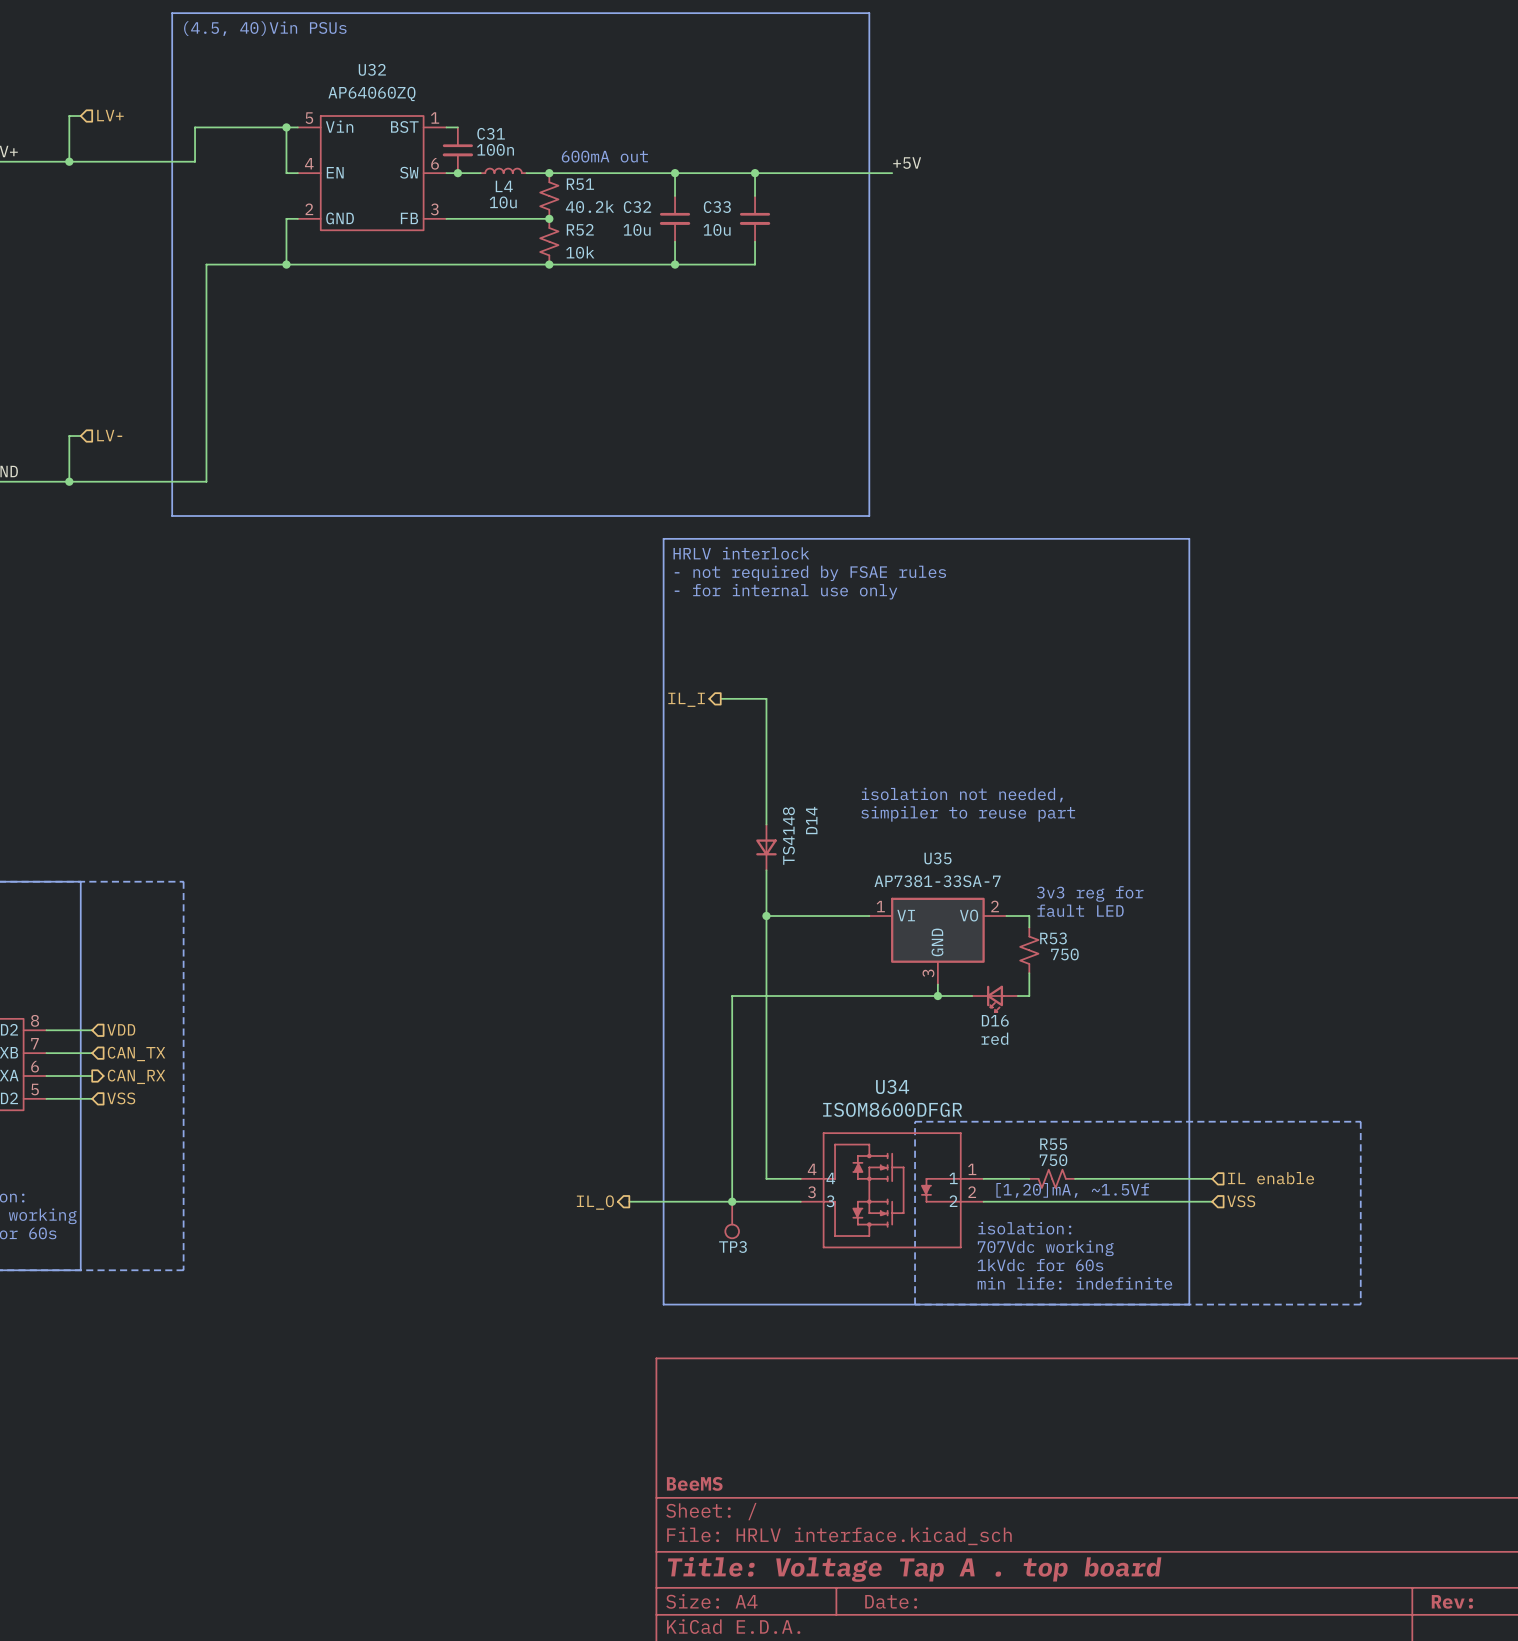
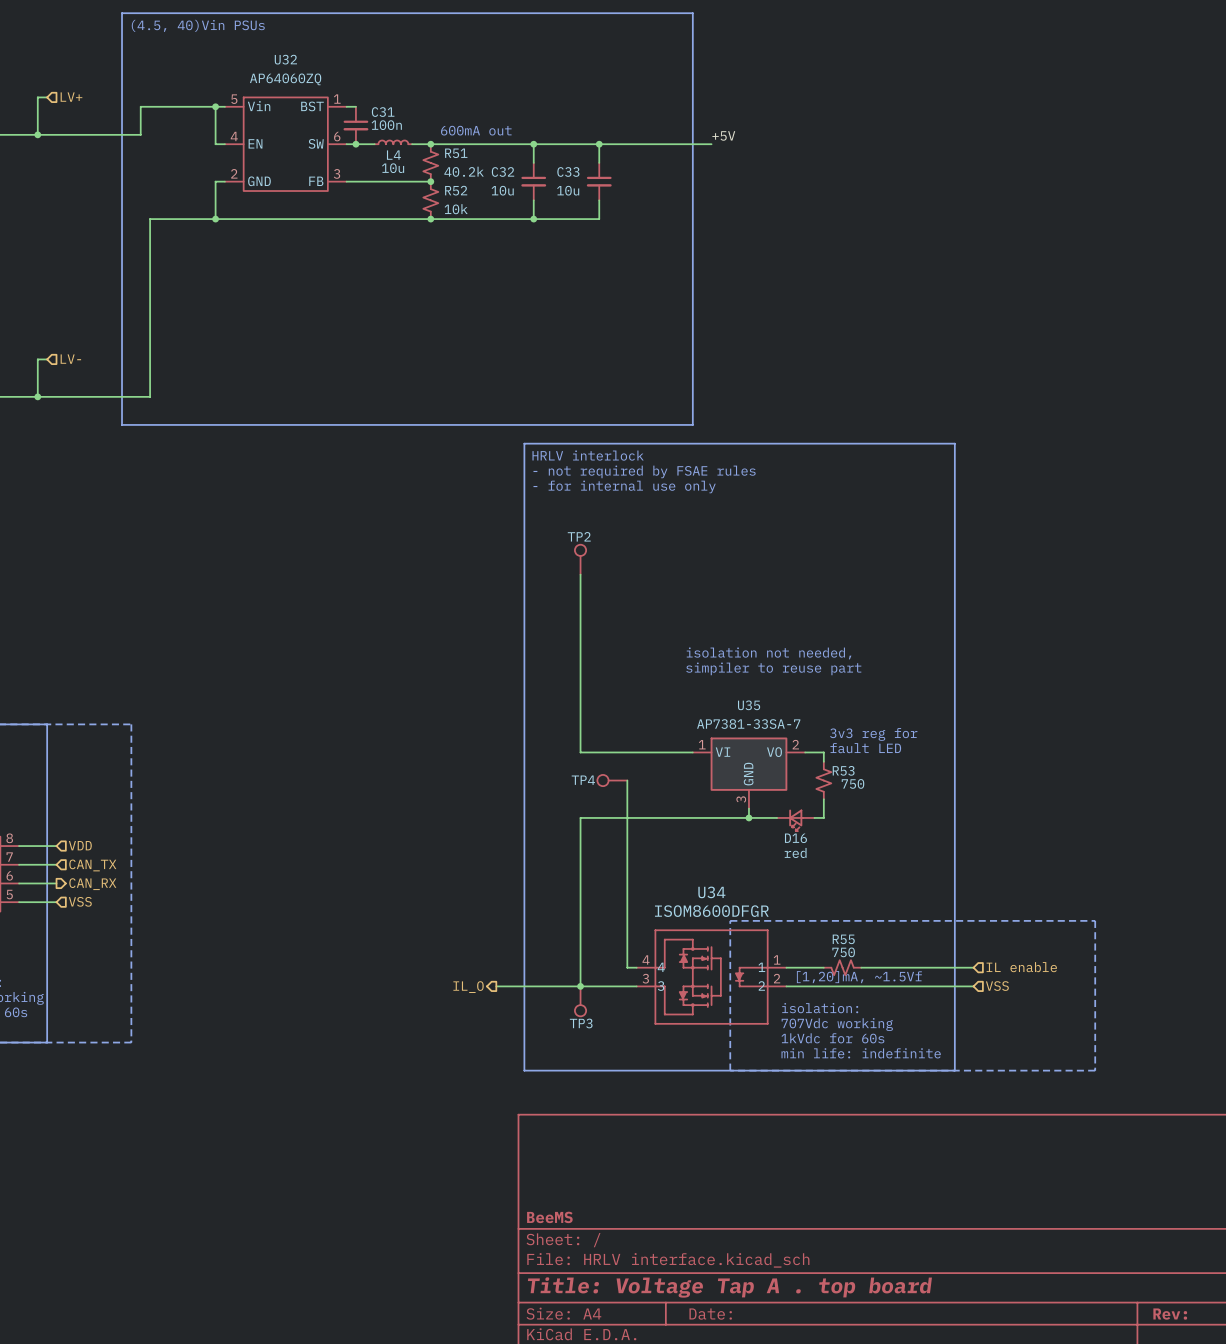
TP2: none -> (580, 559)
wire: (720, 698) (766, 698) (766, 824) -> none
wire: none -> (580, 574) (580, 752) (608, 752)
hierarchical label: IL_I (686, 699) -> none
D14: TS4148 (766, 847) -> none
wire: (766, 870) (766, 1178) (789, 1178) -> (627, 780) (627, 967)
junction: (766, 916) -> none
TP4: none -> (612, 780)

